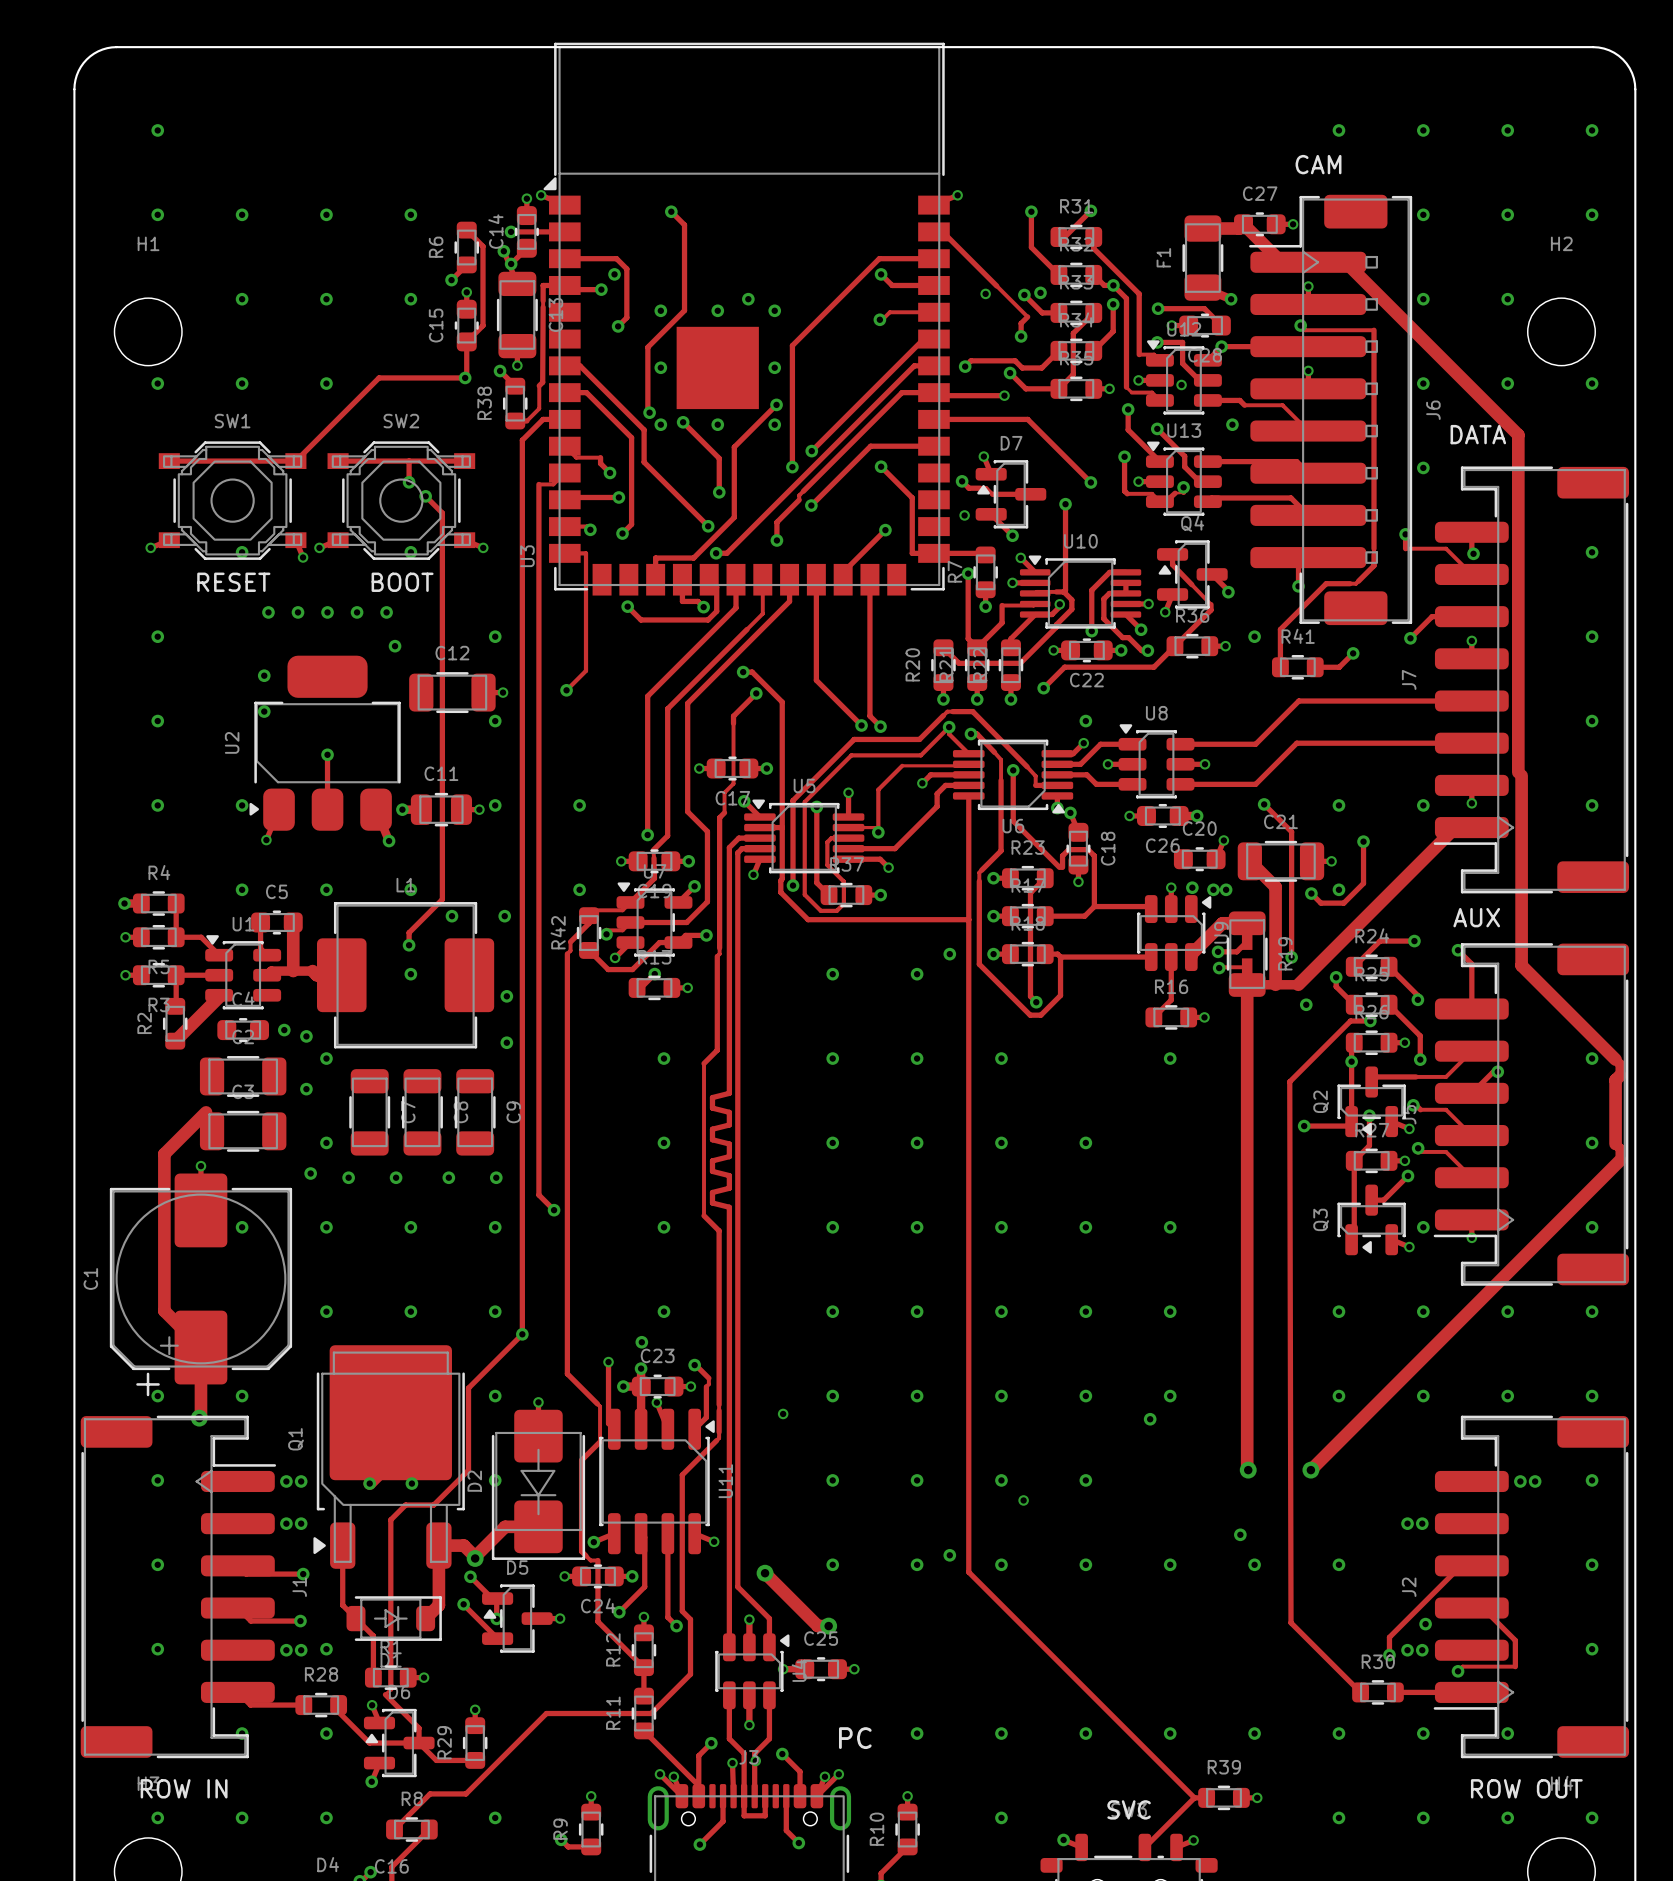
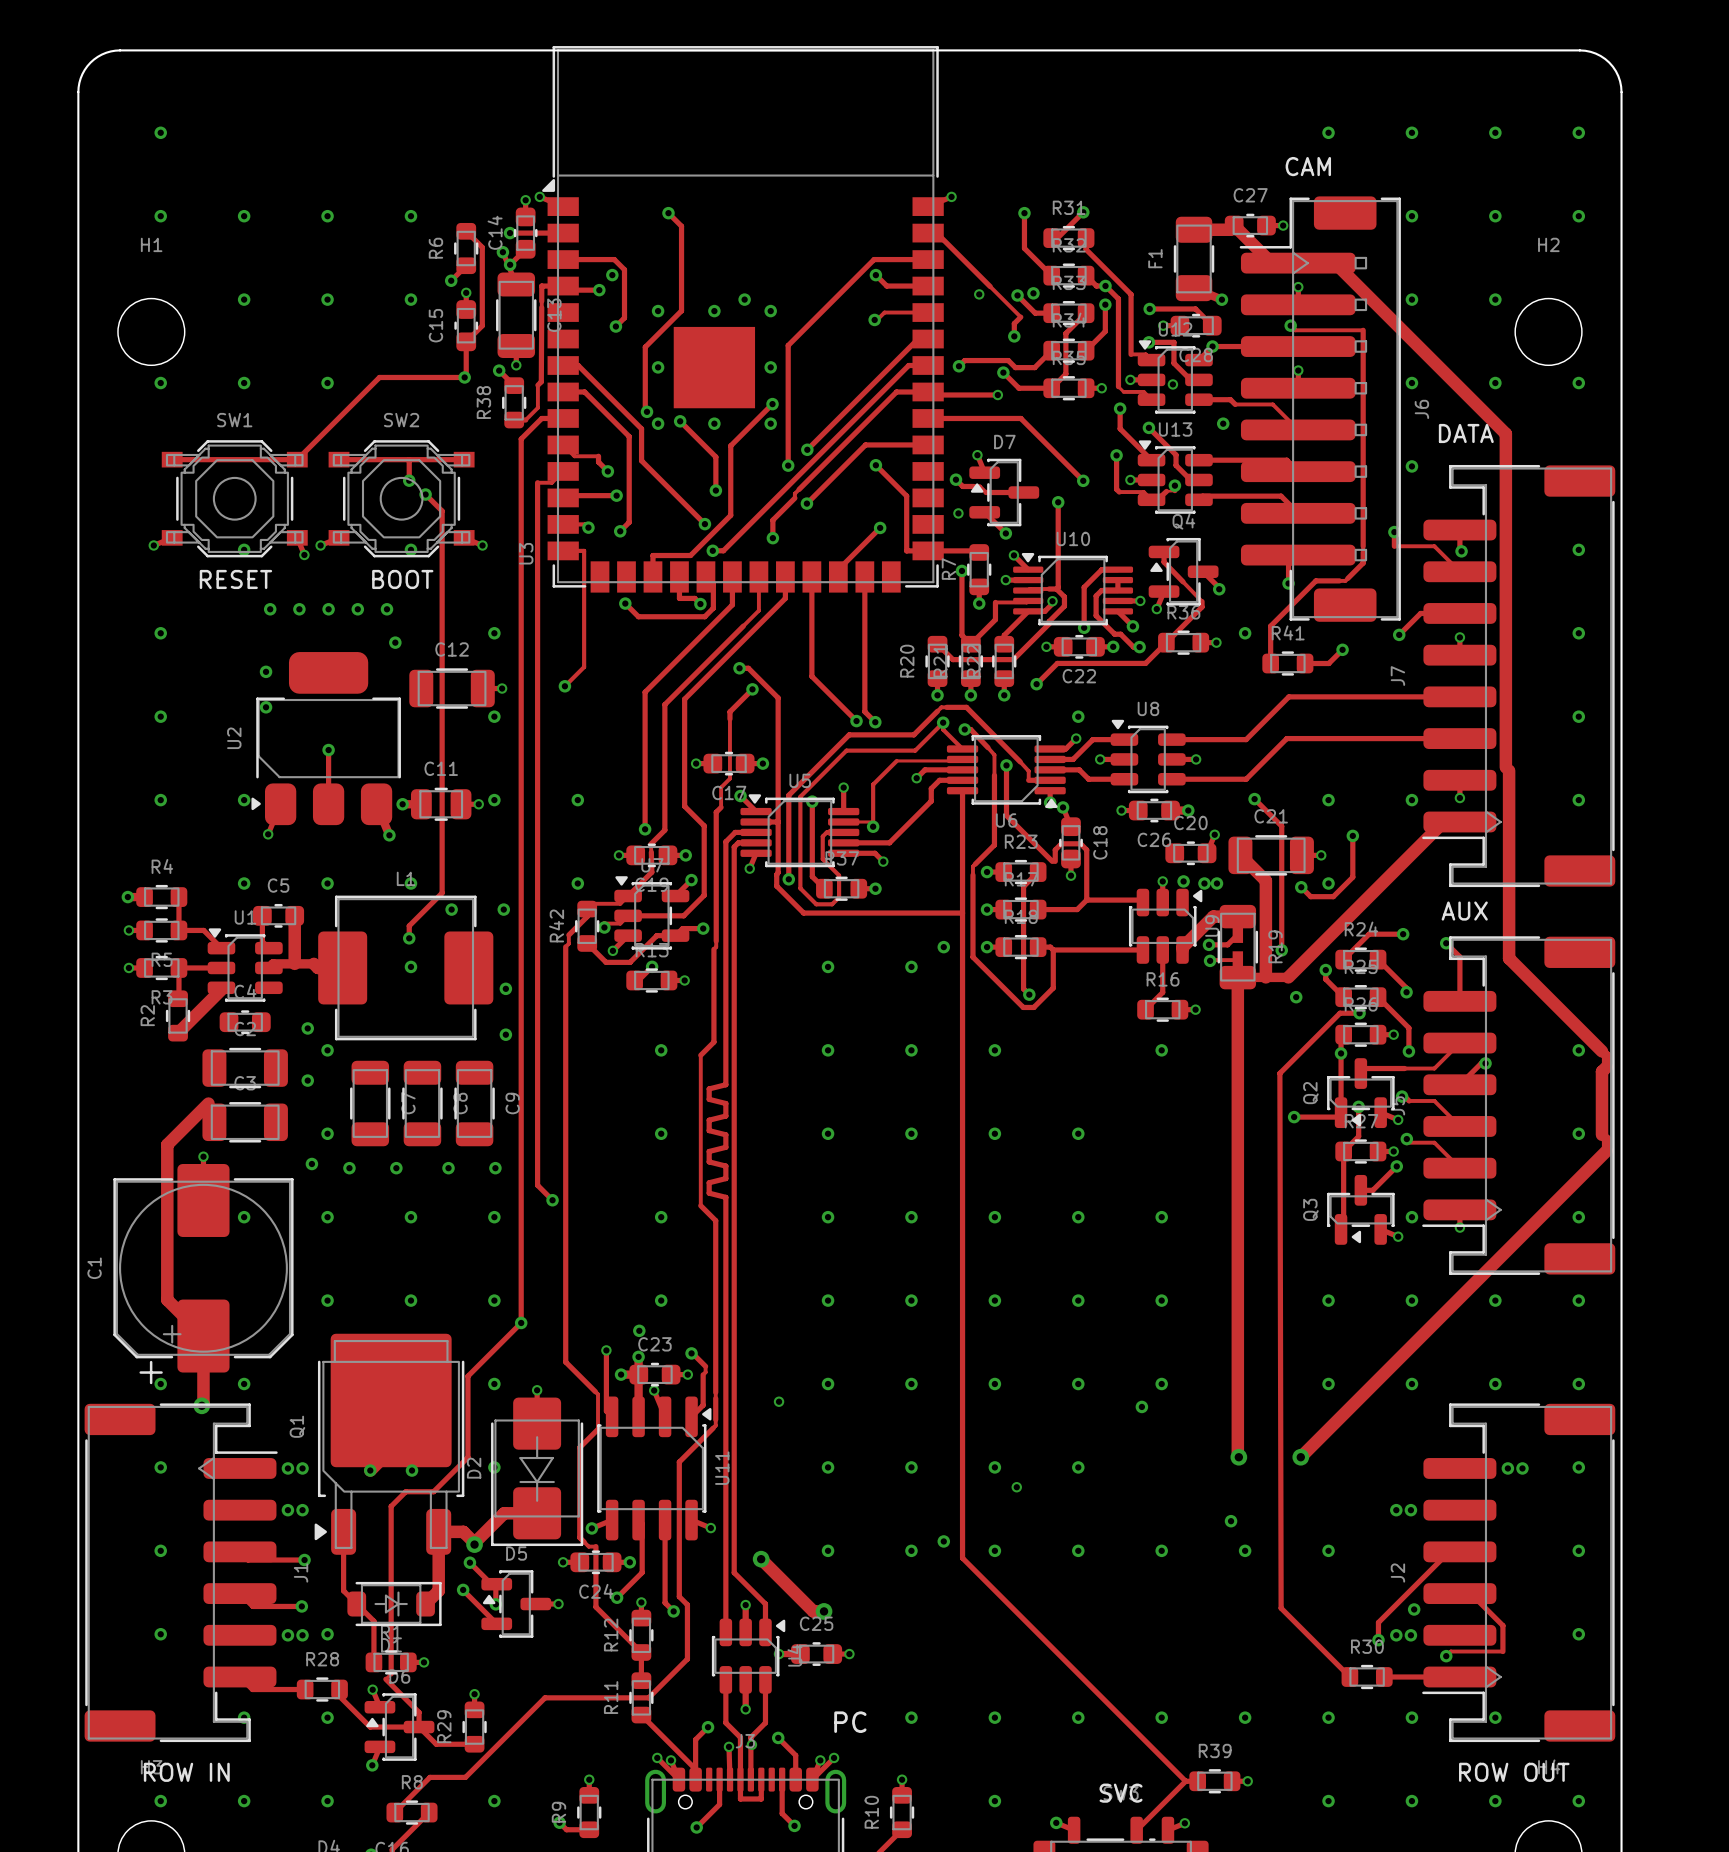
via: (284, 1030) -> none

